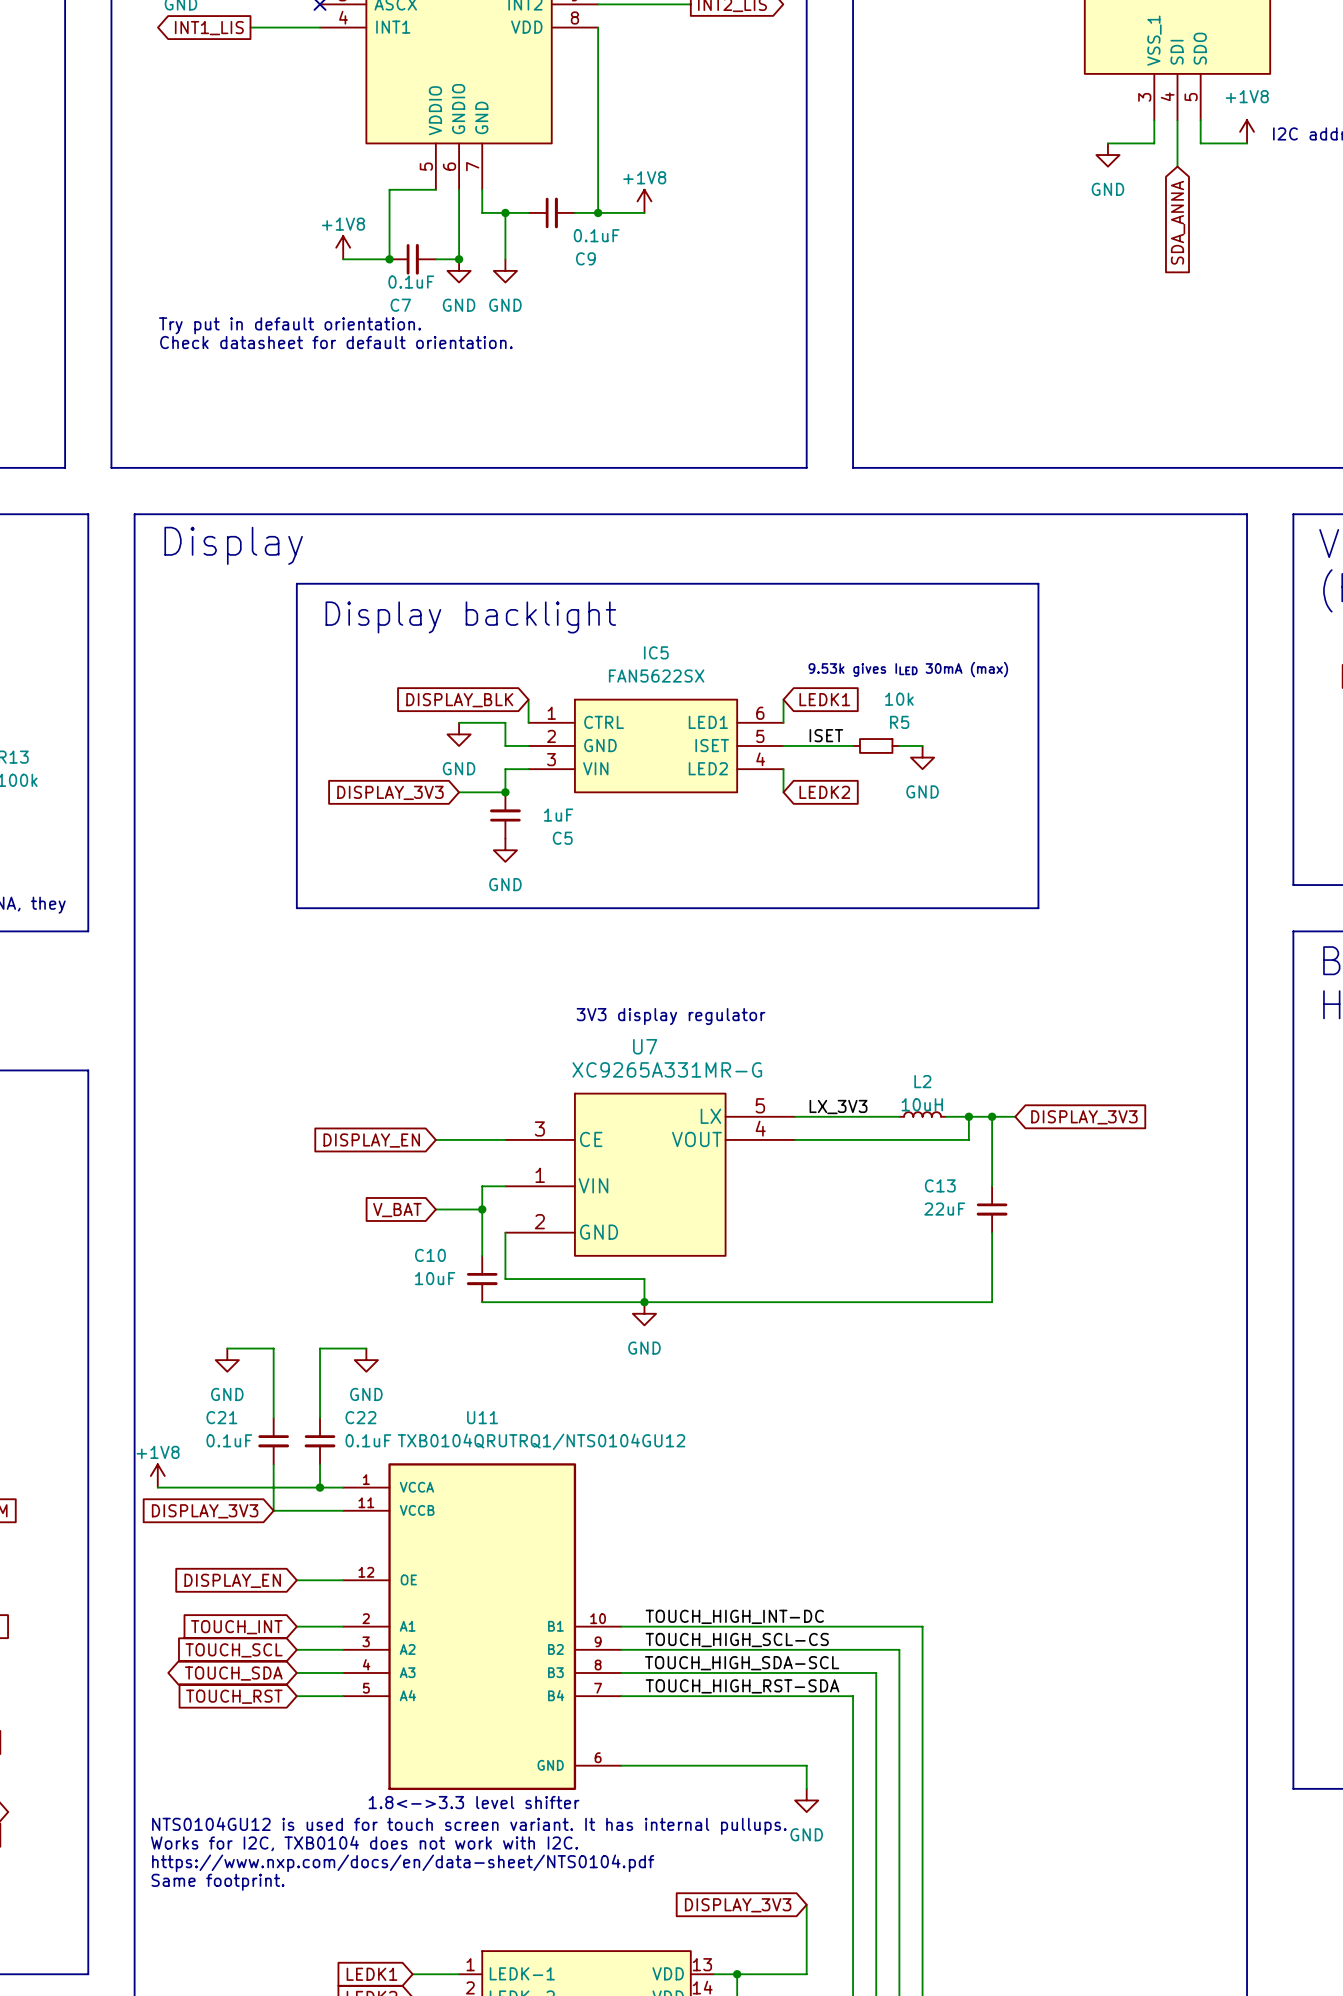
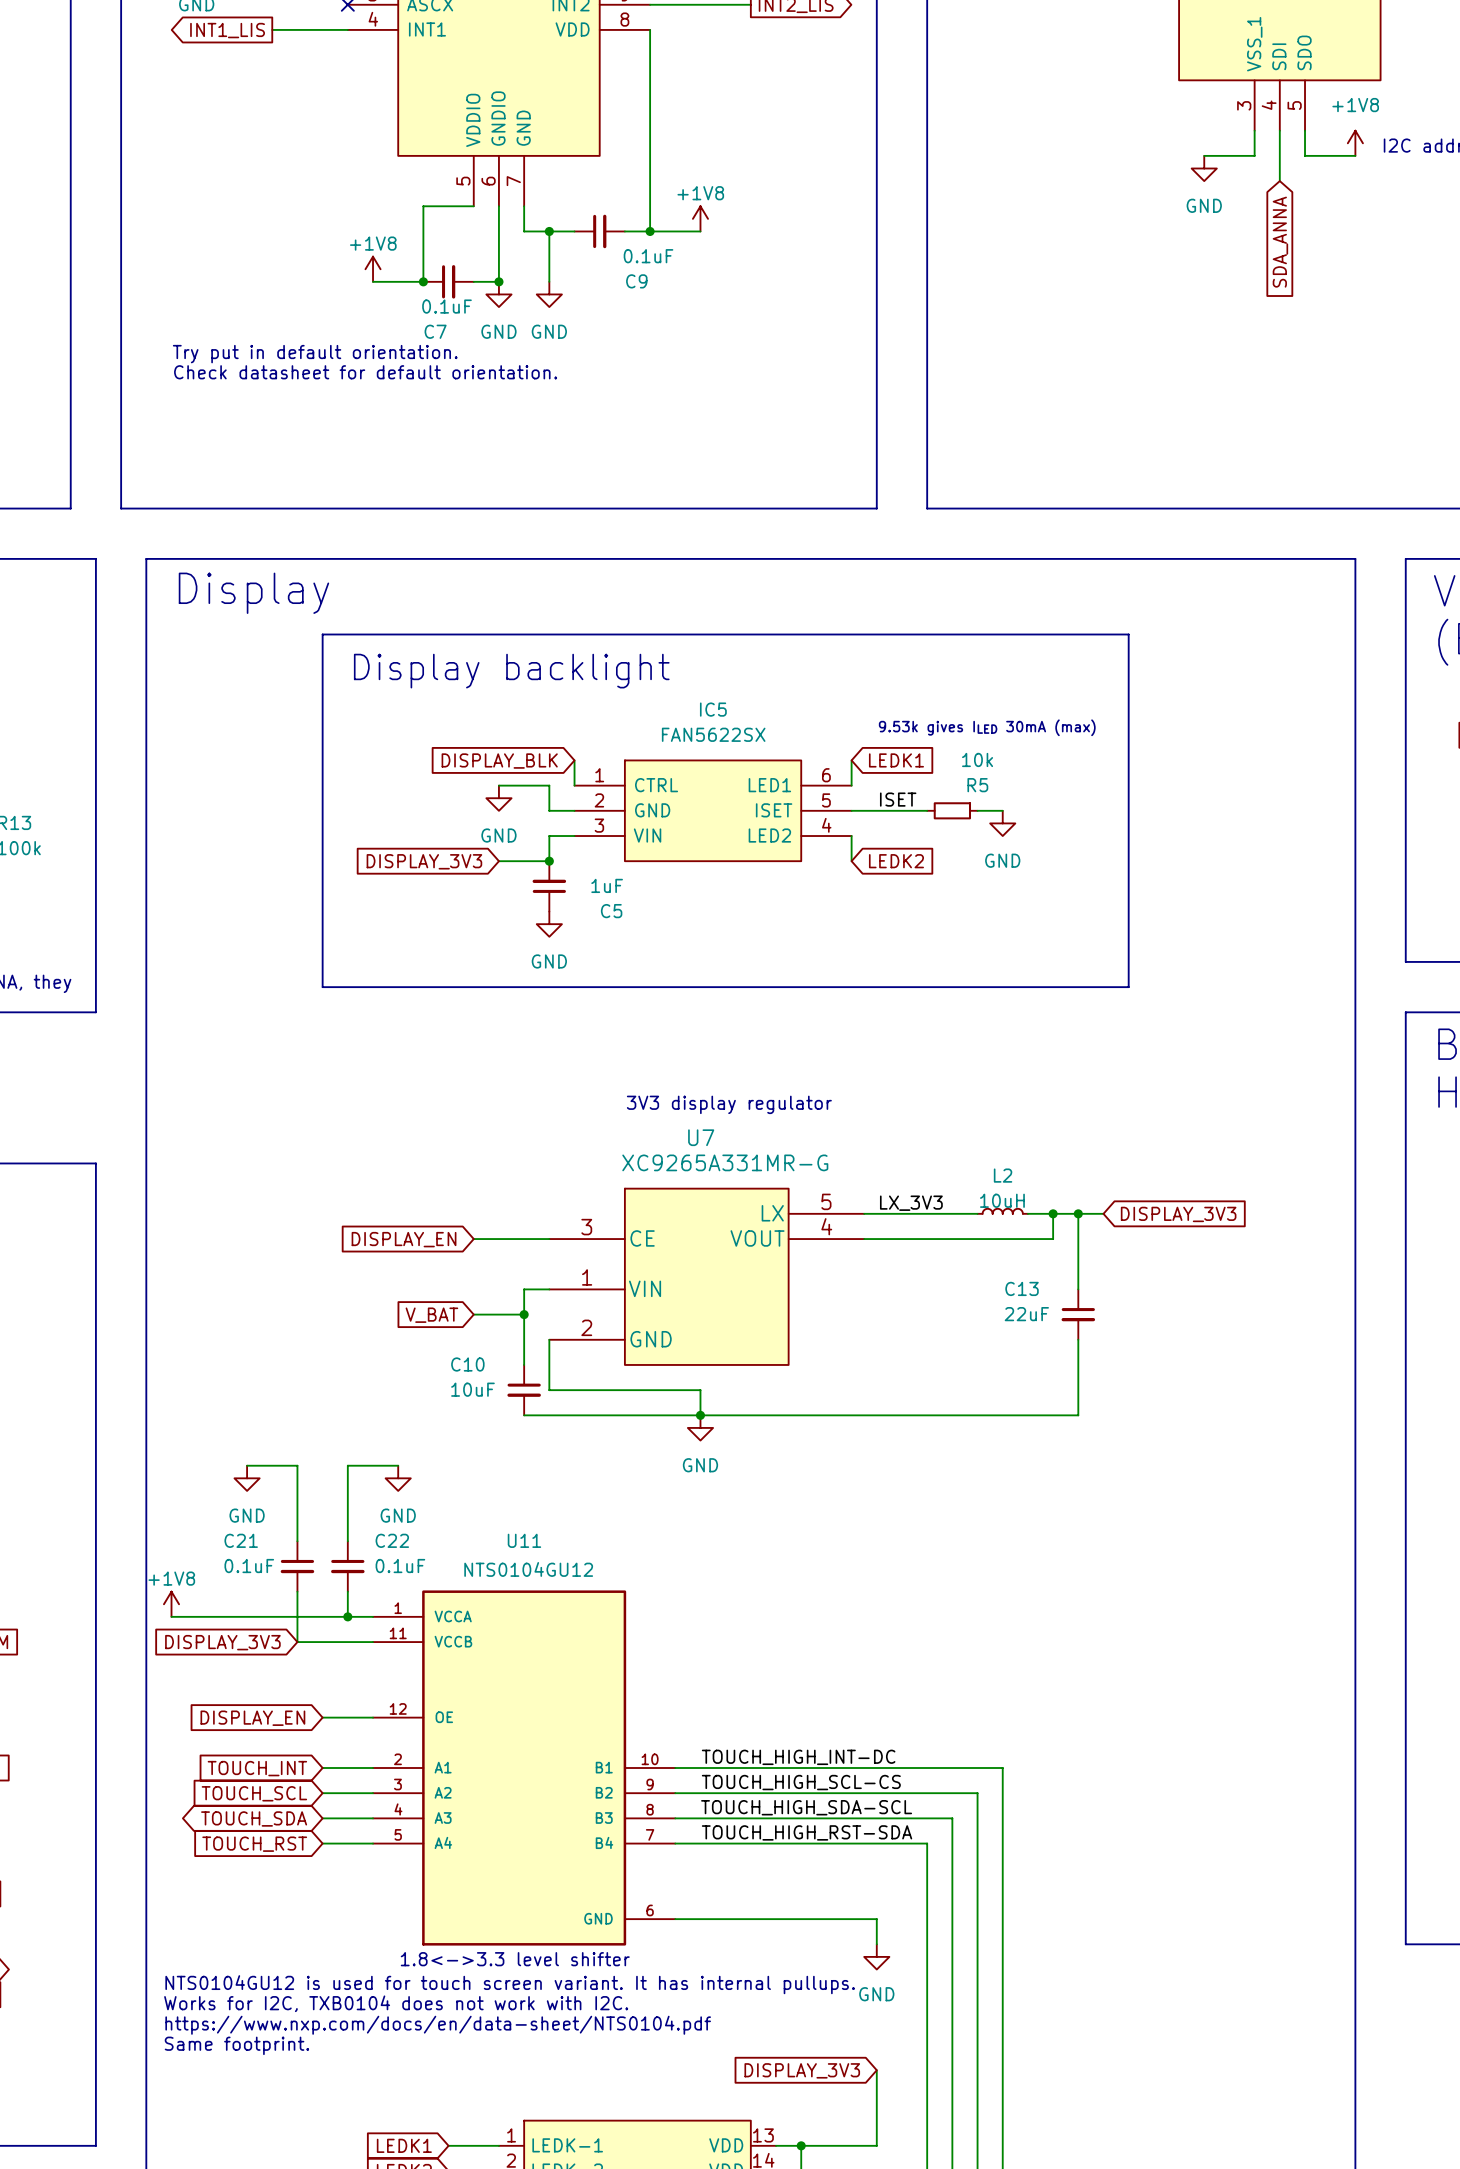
U11 value: TXB0104QRUTRQ1/NTS0104GU12 (541, 1441) -> NTS0104GU12 (528, 1569)

